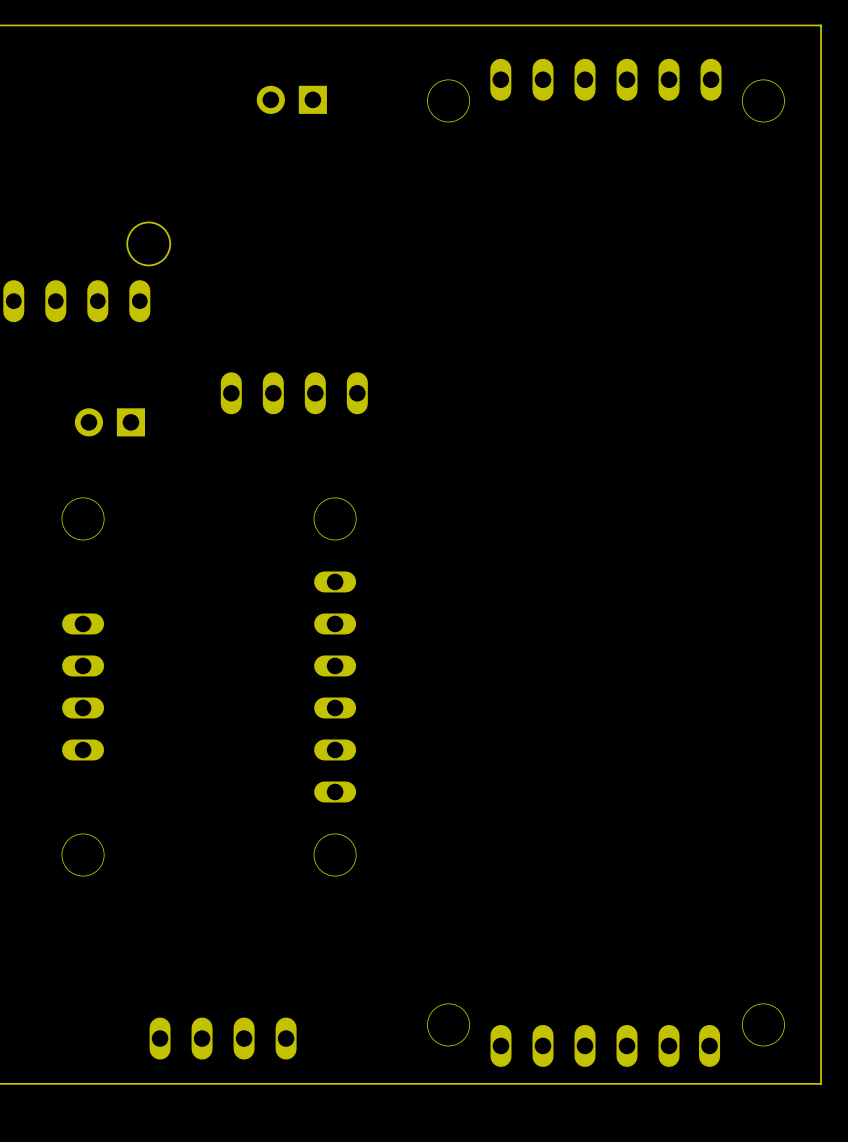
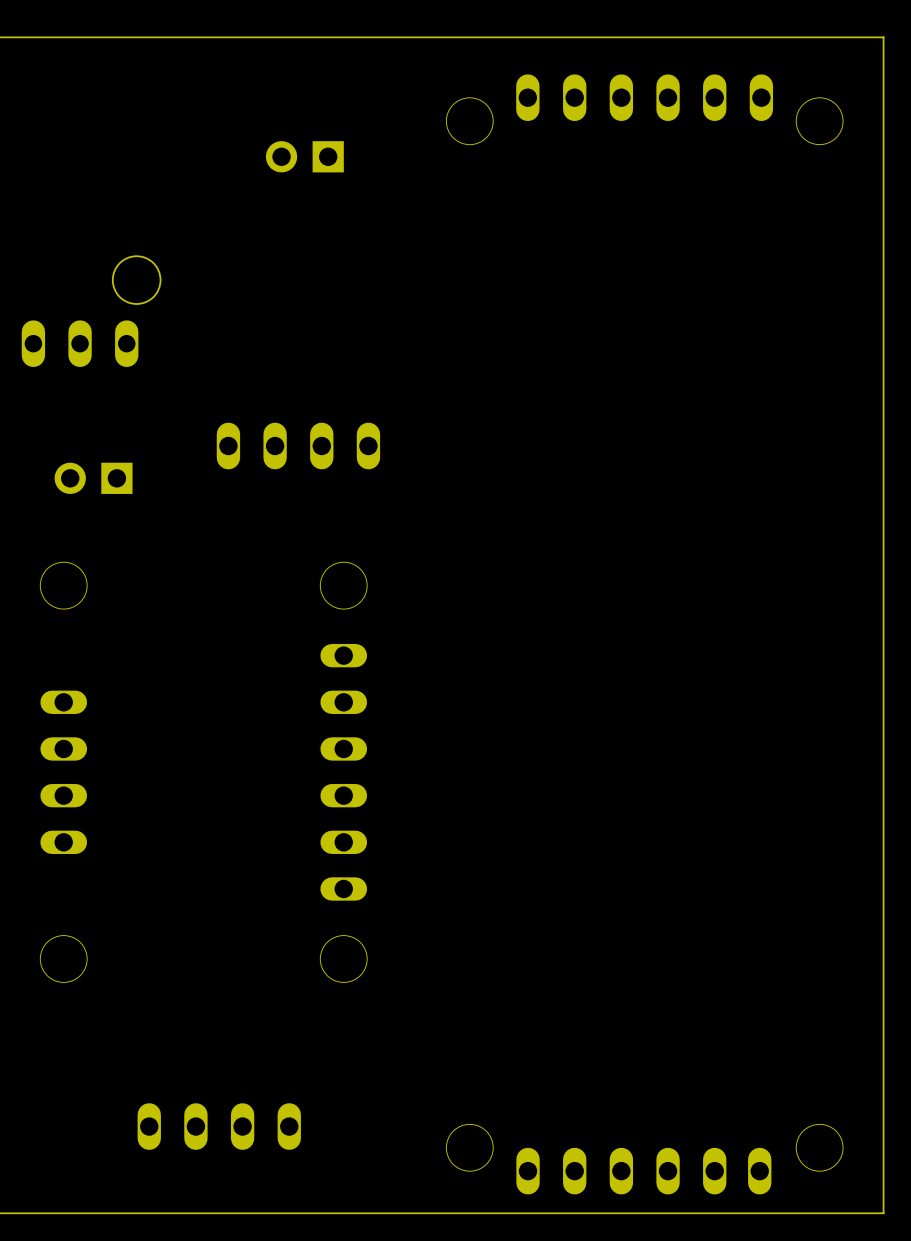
part position: (291, 99) -> (304, 156)
part position: (223, 1038) -> (219, 1126)

